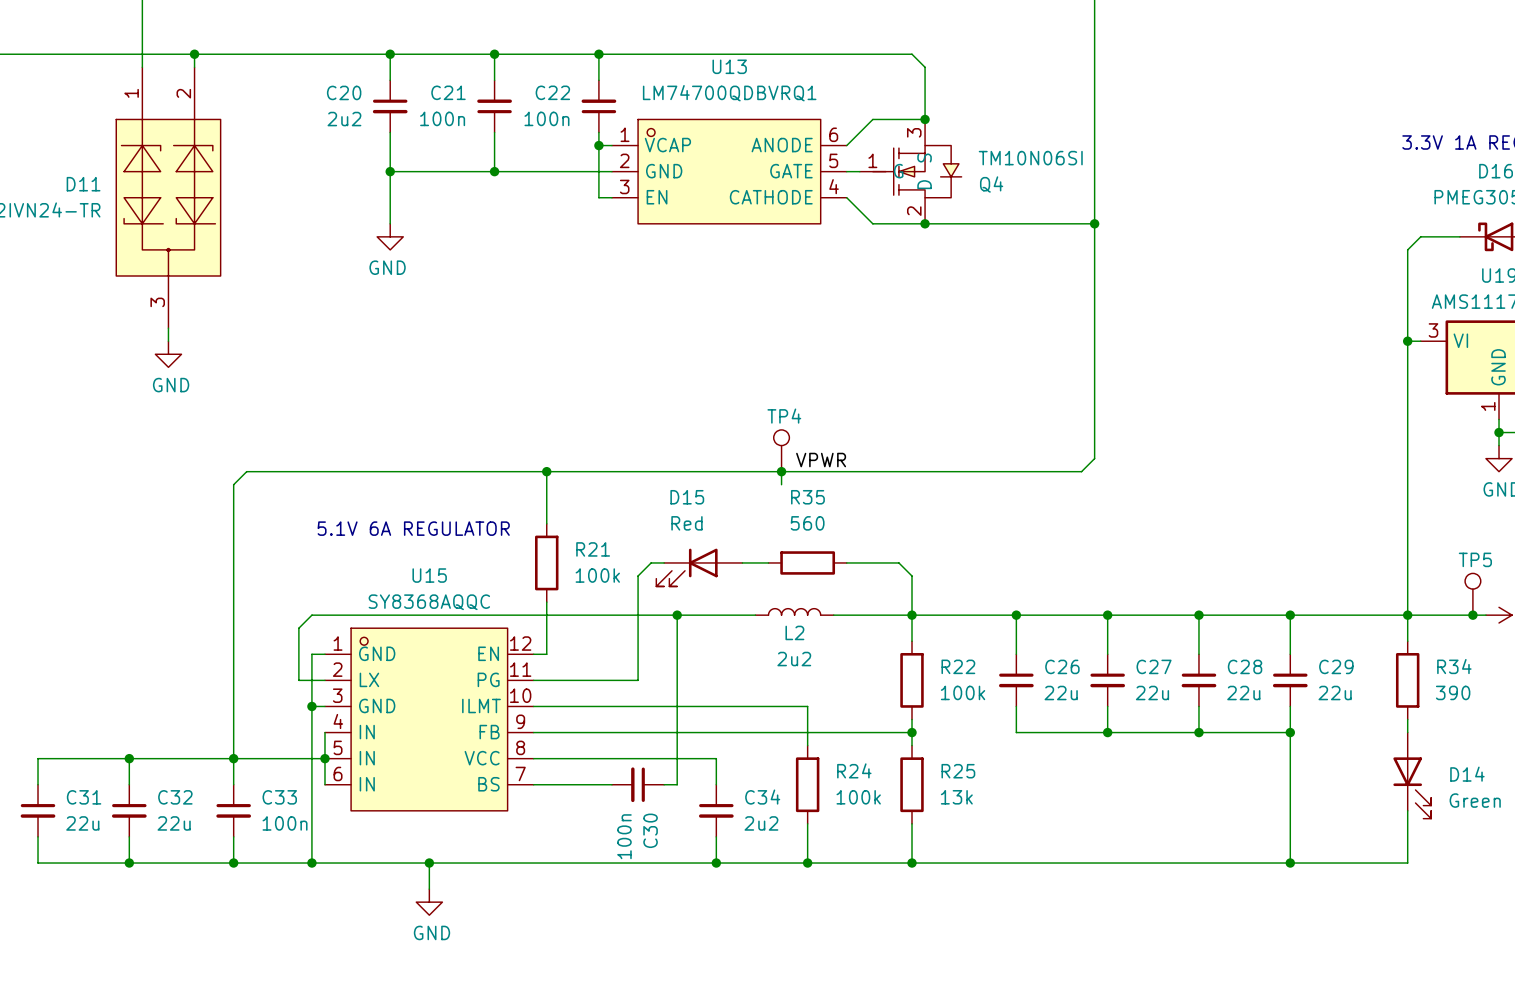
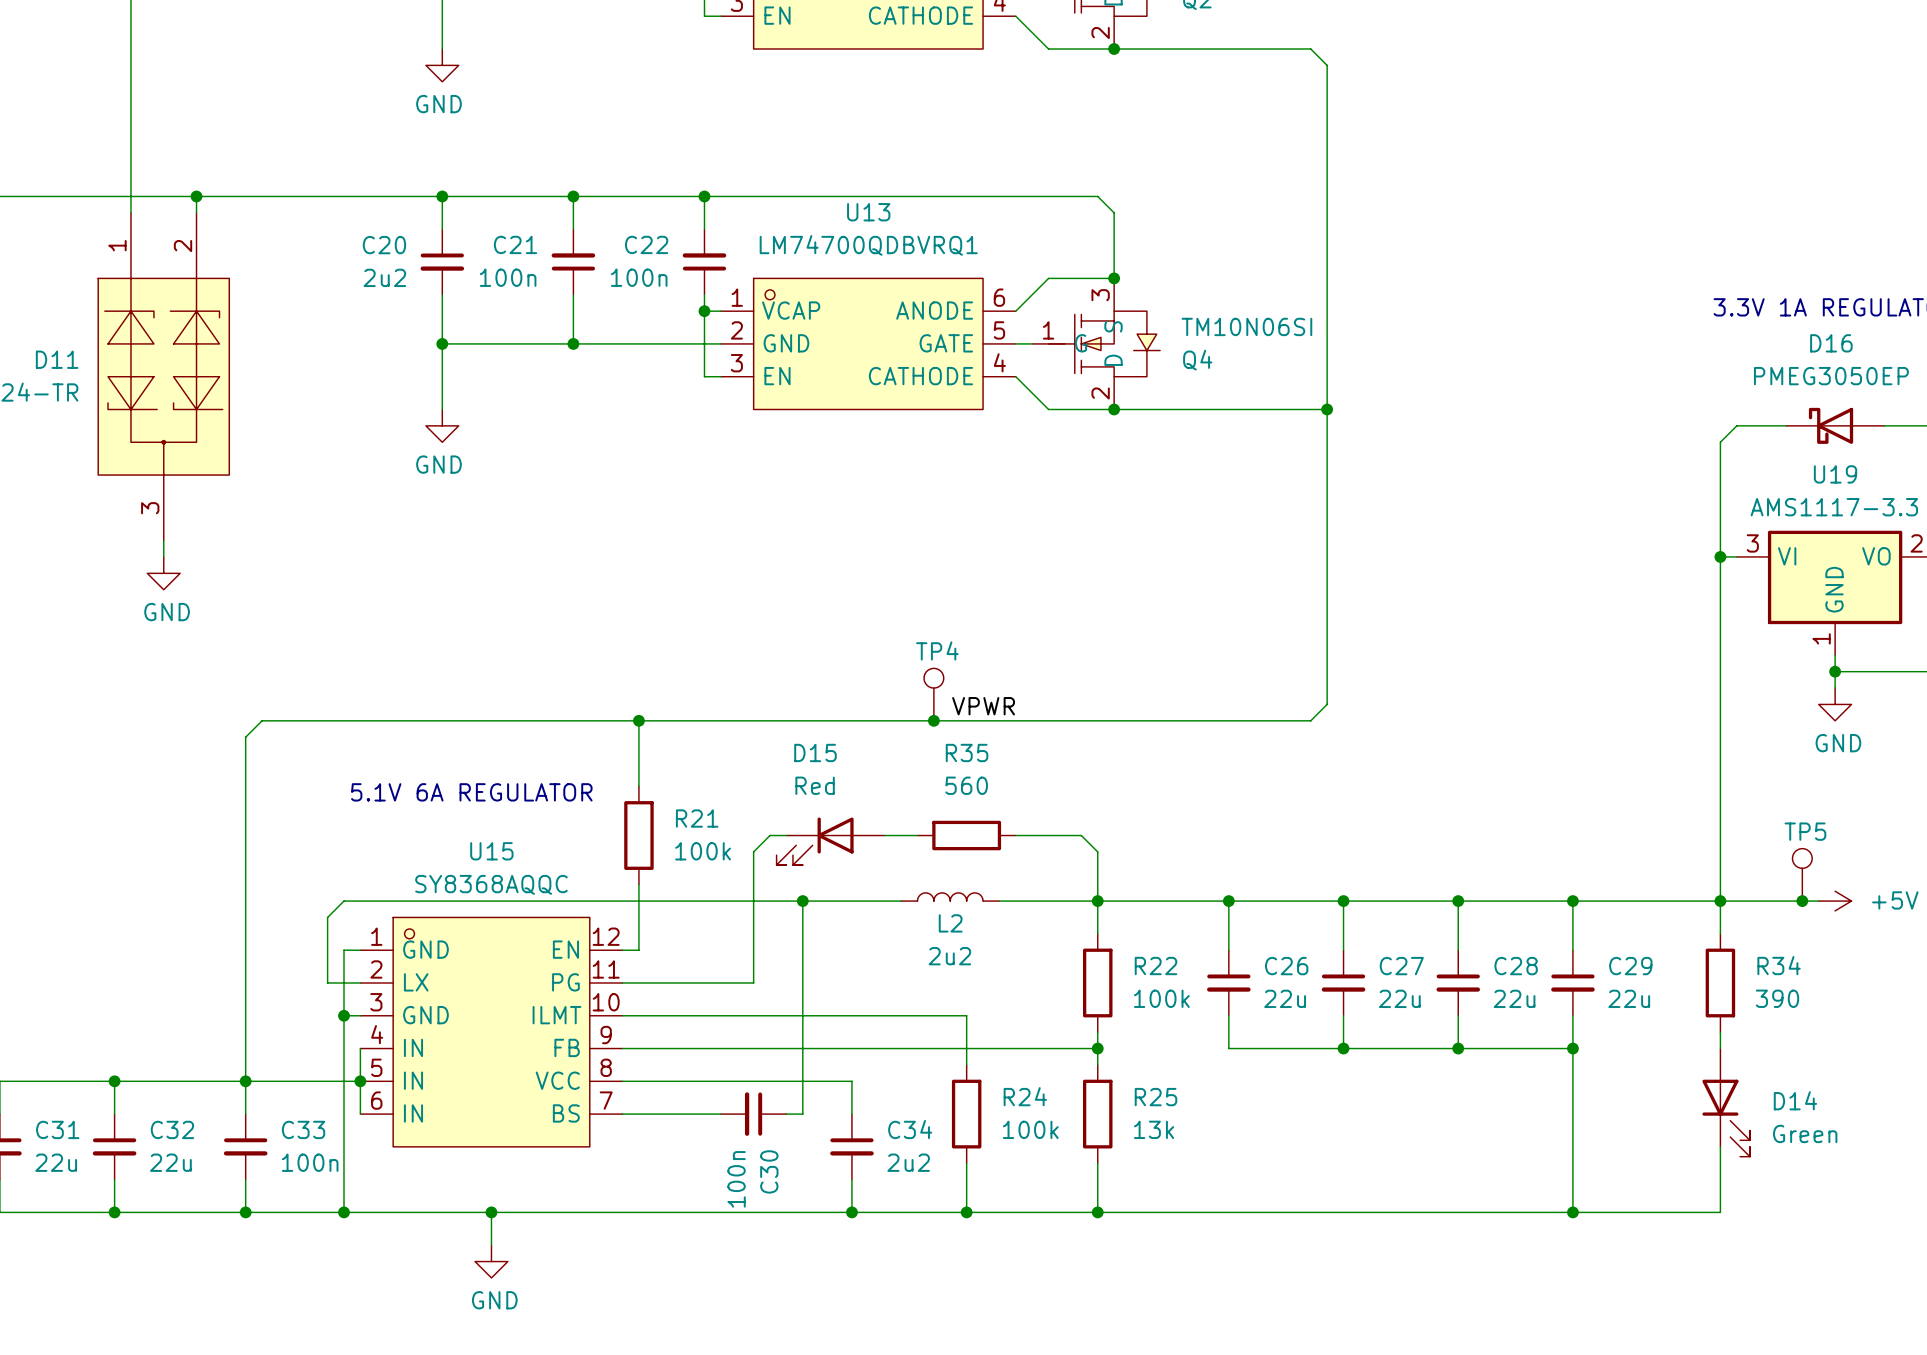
wire: (781, 471) (781, 484) -> none

